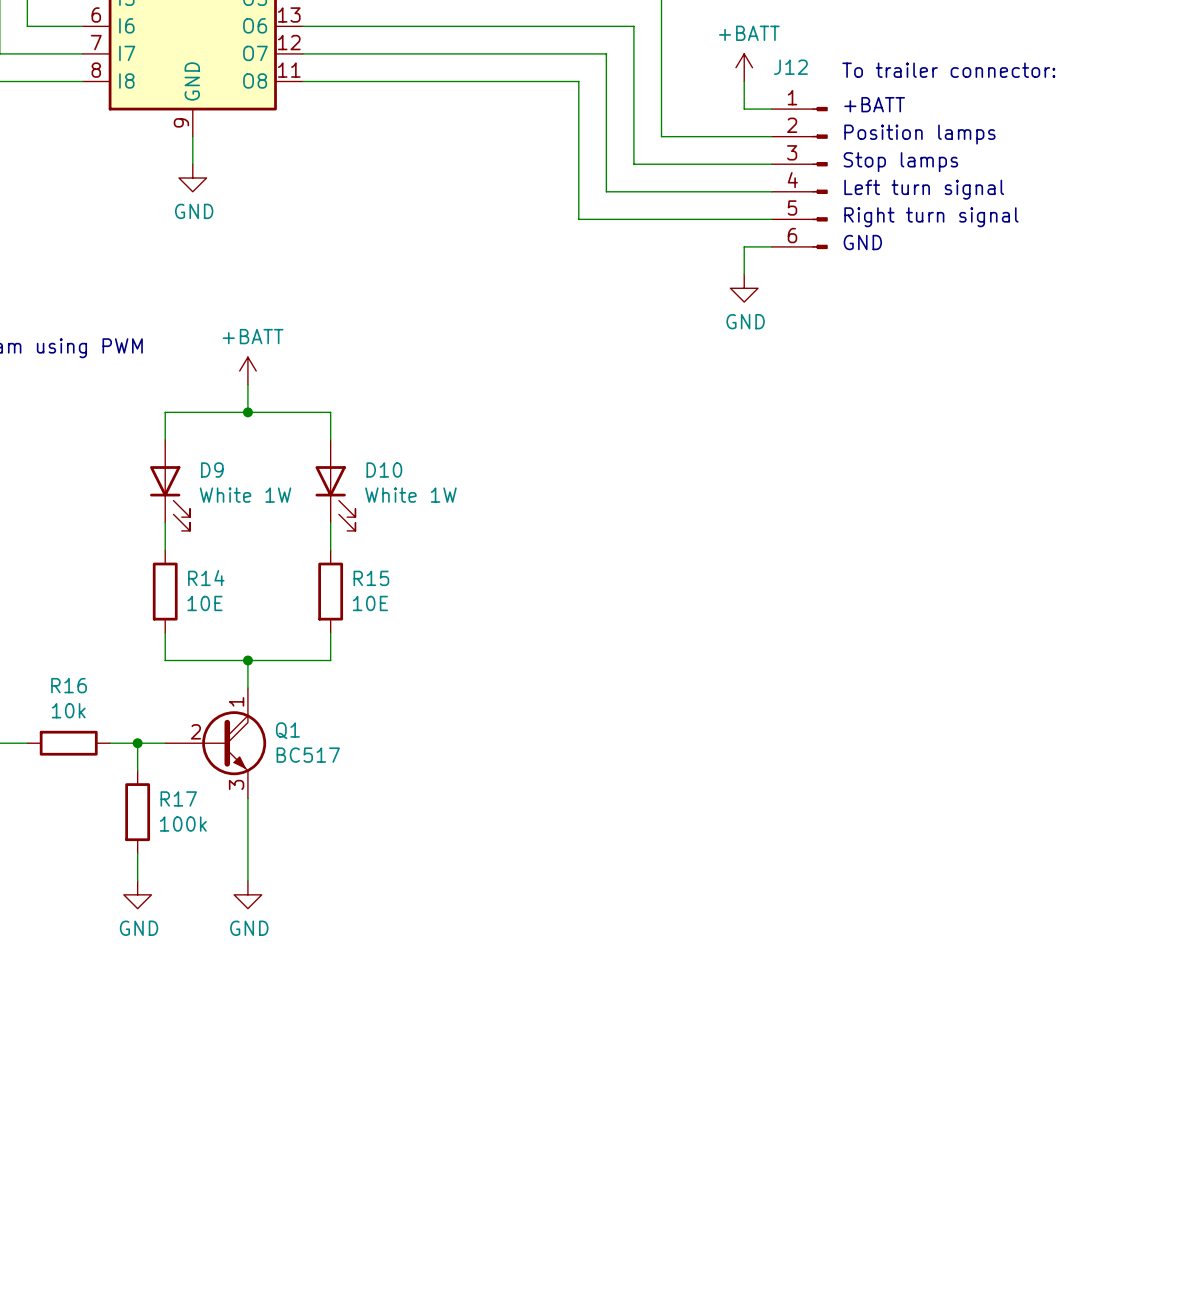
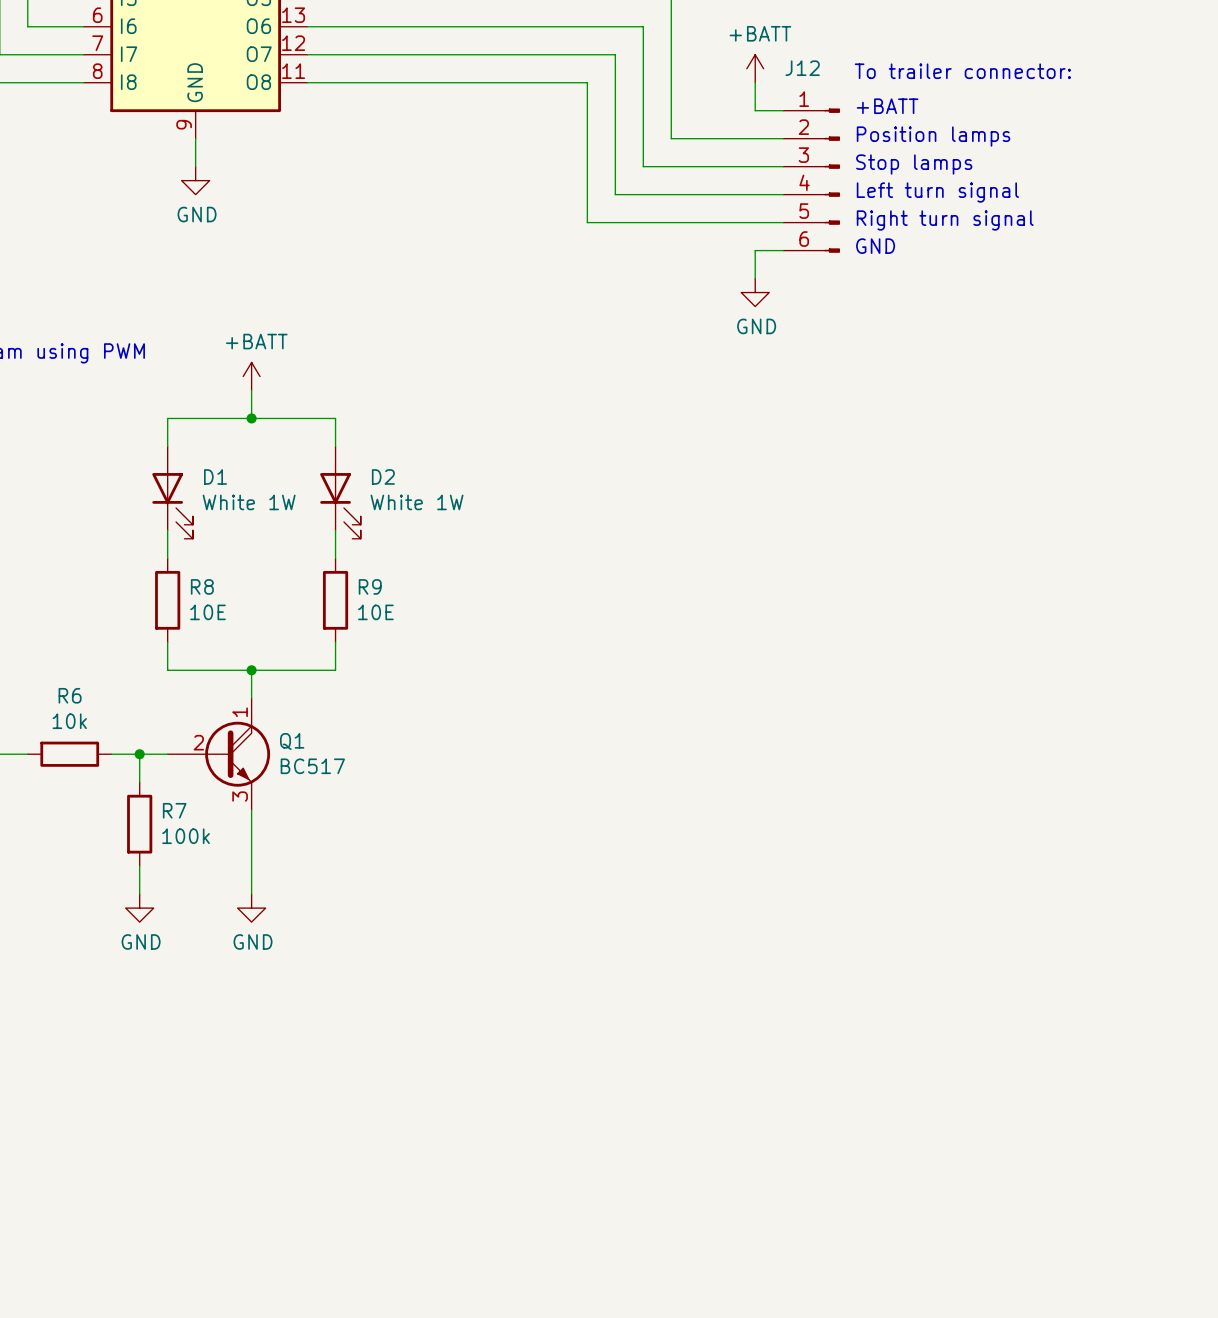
D9 name: D9 (212, 470) -> D1 (215, 476)
D10 name: D10 (384, 470) -> D2 (383, 476)
R14 name: R14 (206, 578) -> R8 (202, 586)
R15 name: R15 (371, 578) -> R9 (370, 586)
R16 name: R16 (69, 685) -> R6 (70, 695)
R17 name: R17 (178, 798) -> R7 (174, 810)

